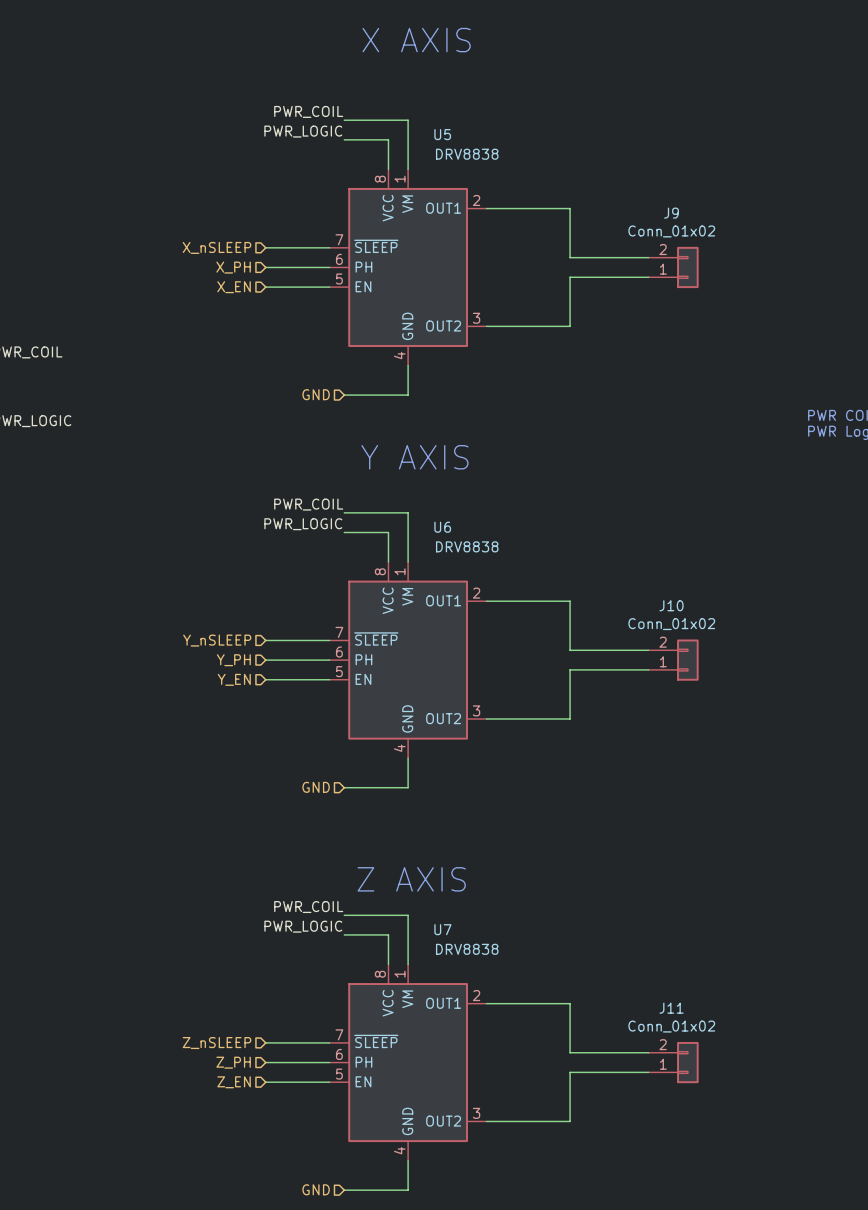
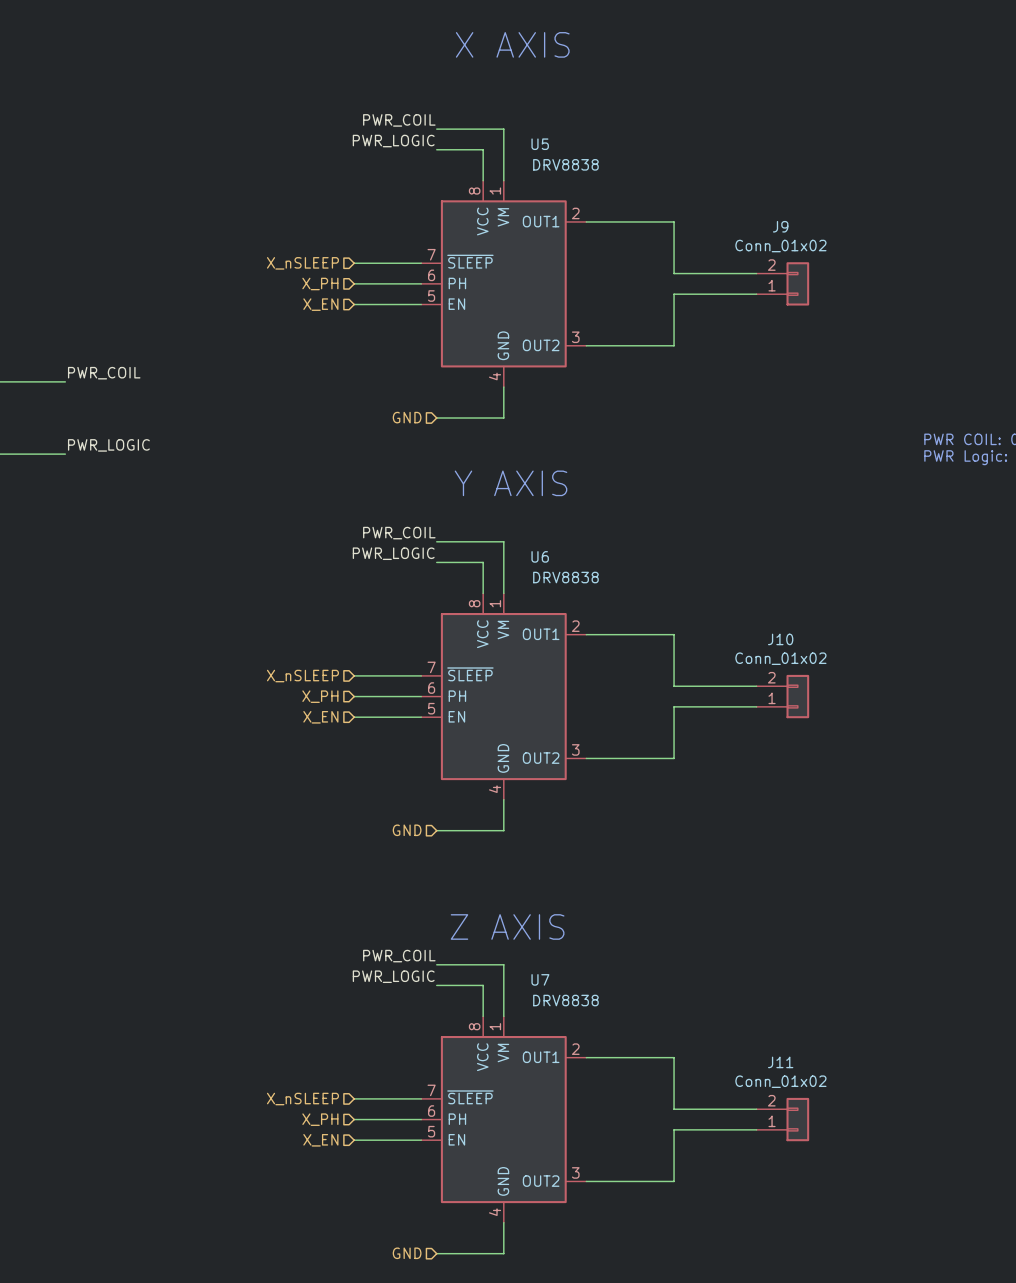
hierarchical label: Y_nSLEEP (217, 640) -> X_nSLEEP (302, 676)
hierarchical label: Y_PH (233, 660) -> X_PH (320, 696)
hierarchical label: Y_EN (234, 679) -> X_EN (320, 717)
hierarchical label: Z_nSLEEP (217, 1043) -> X_nSLEEP (302, 1099)
hierarchical label: Z_PH (233, 1062) -> X_PH (320, 1119)
hierarchical label: Z_EN (234, 1082) -> X_EN (320, 1140)

